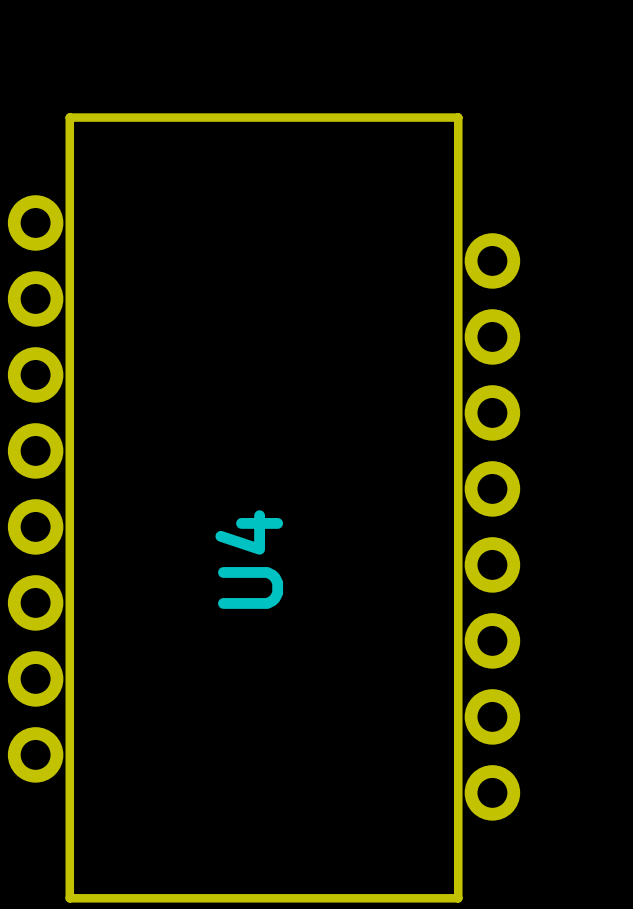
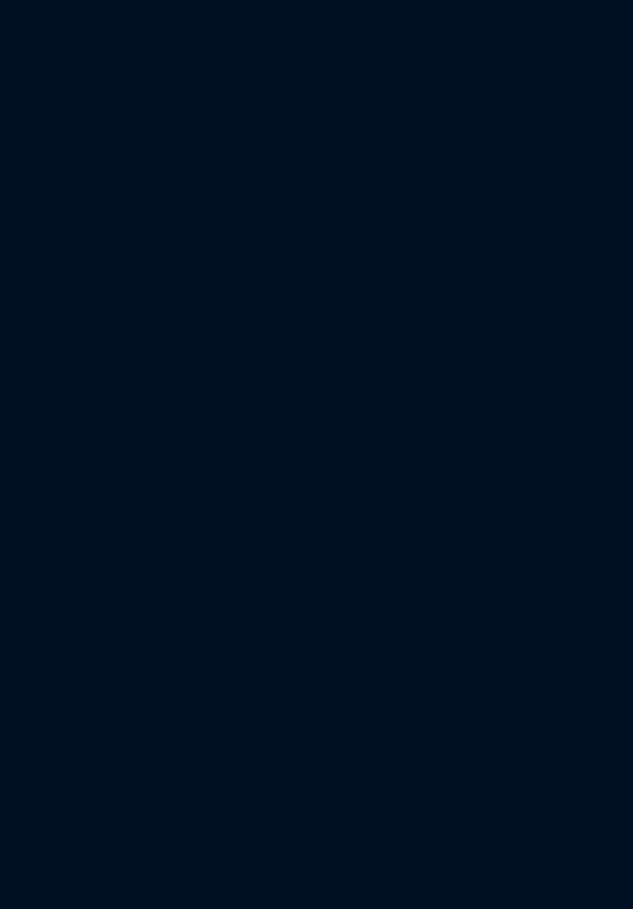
U4: (264, 507) -> none

